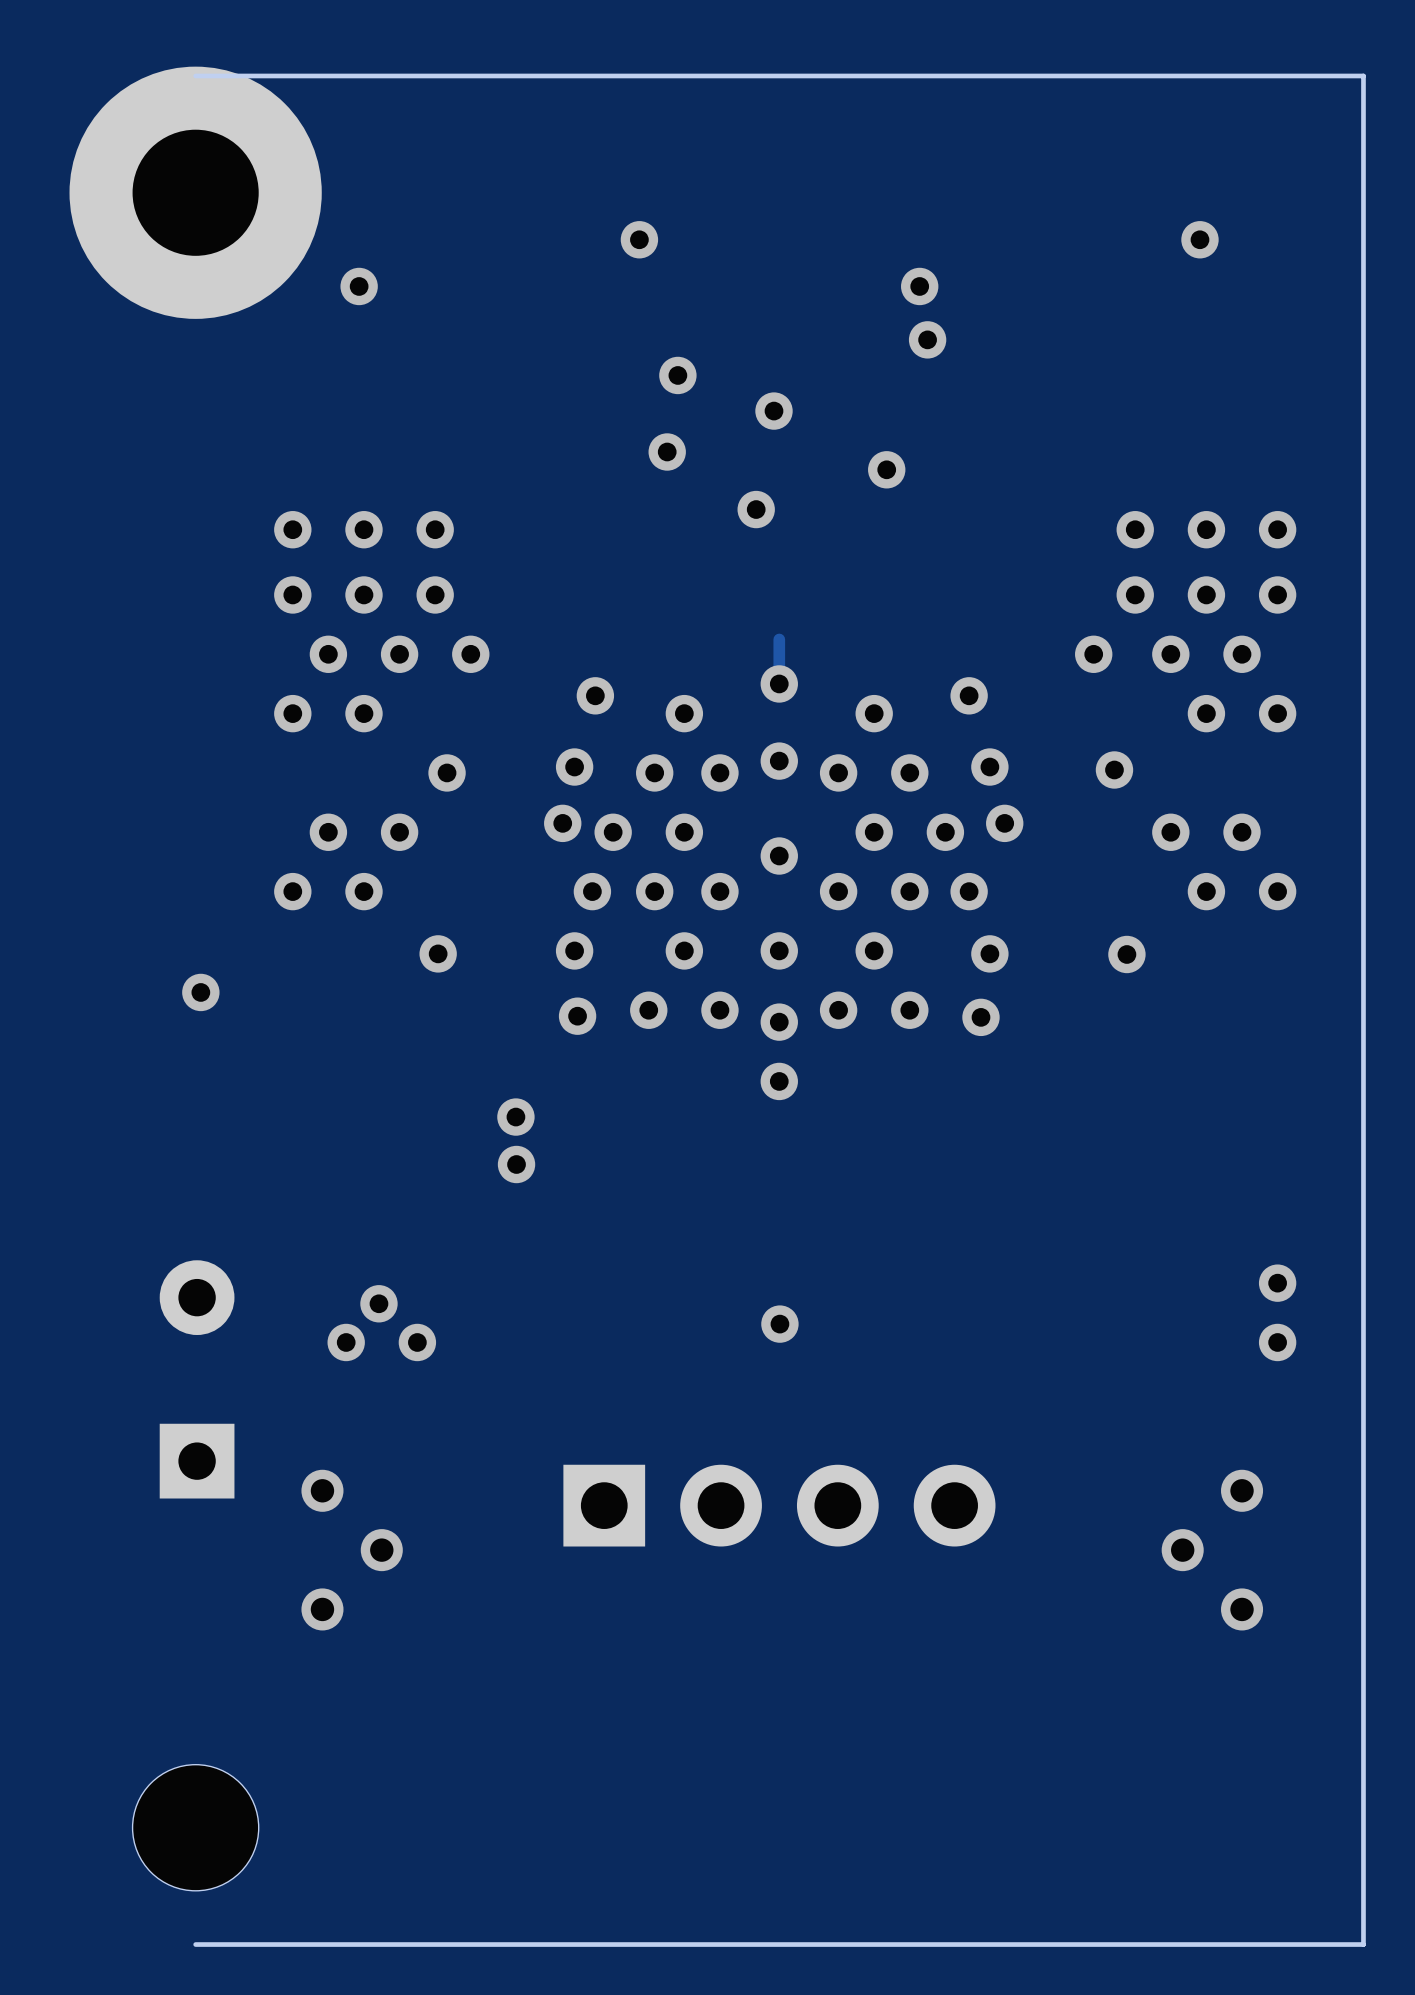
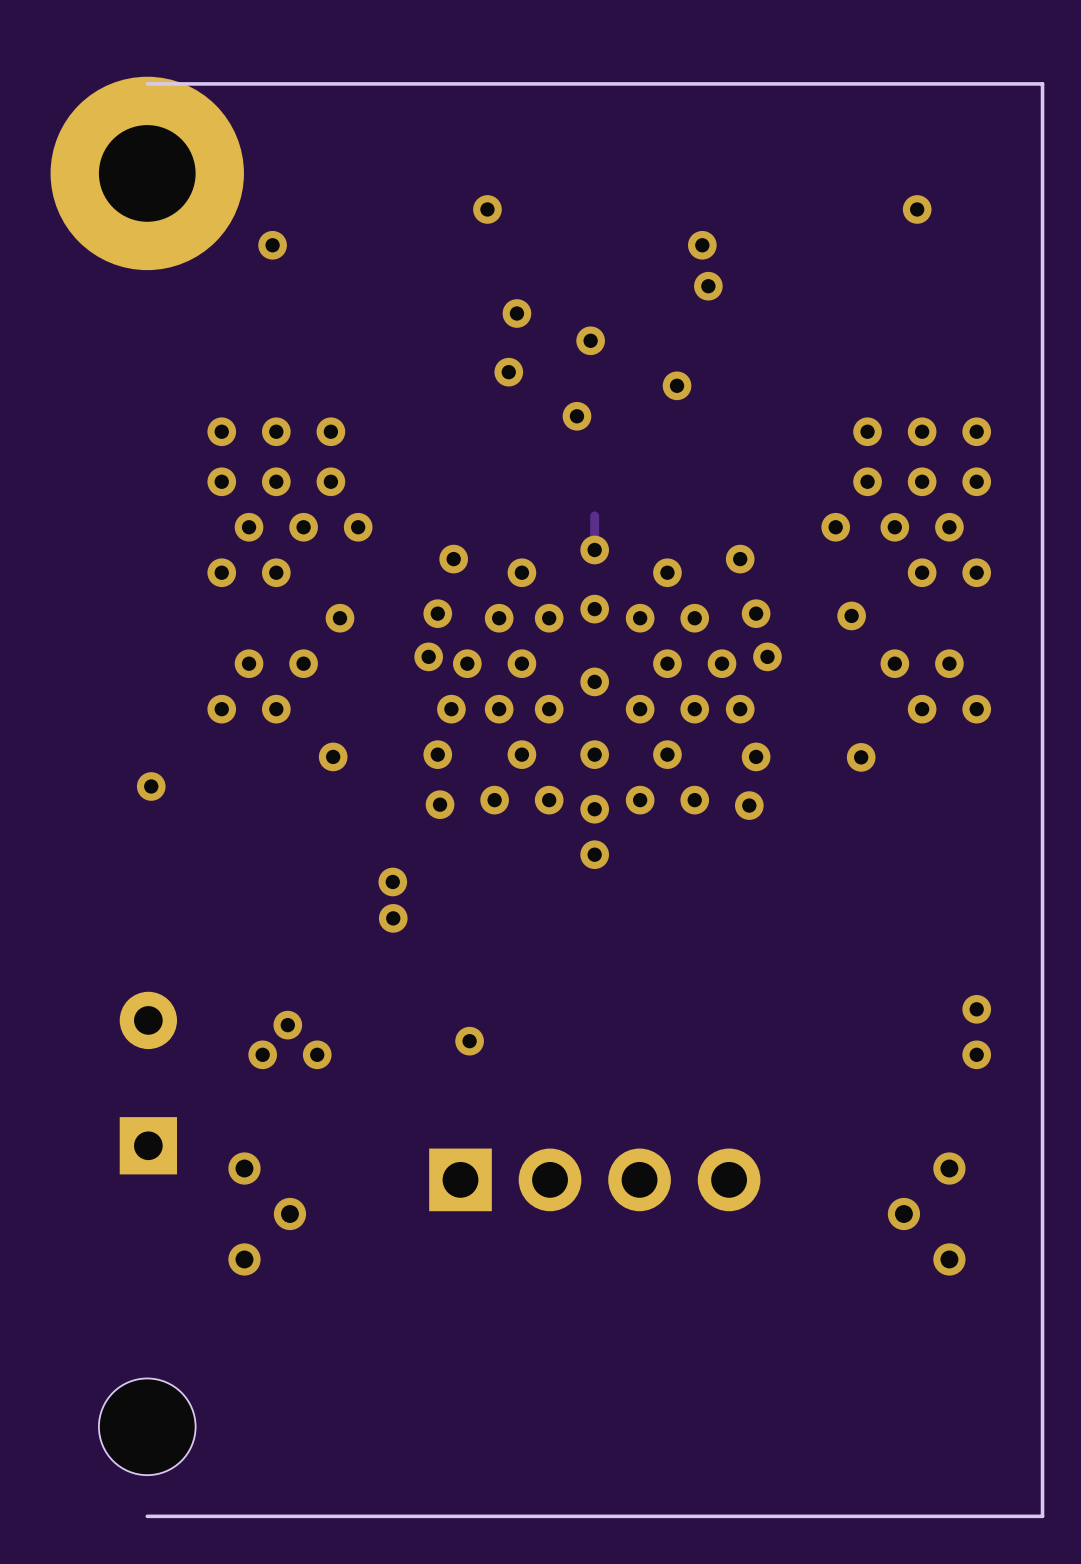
via position: (779, 1324) -> (469, 1041)

